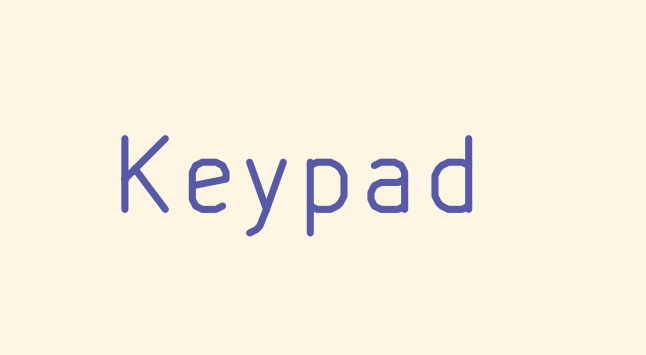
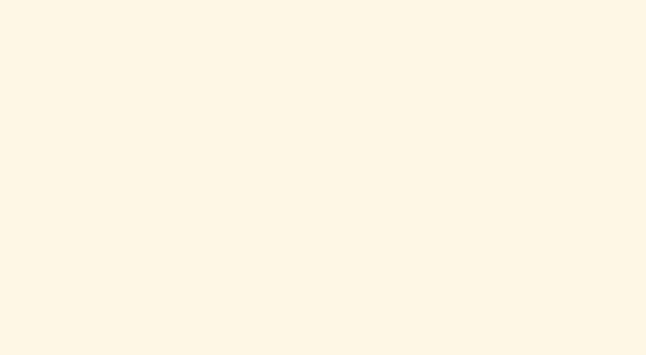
text: Keypad (296, 185) -> none

